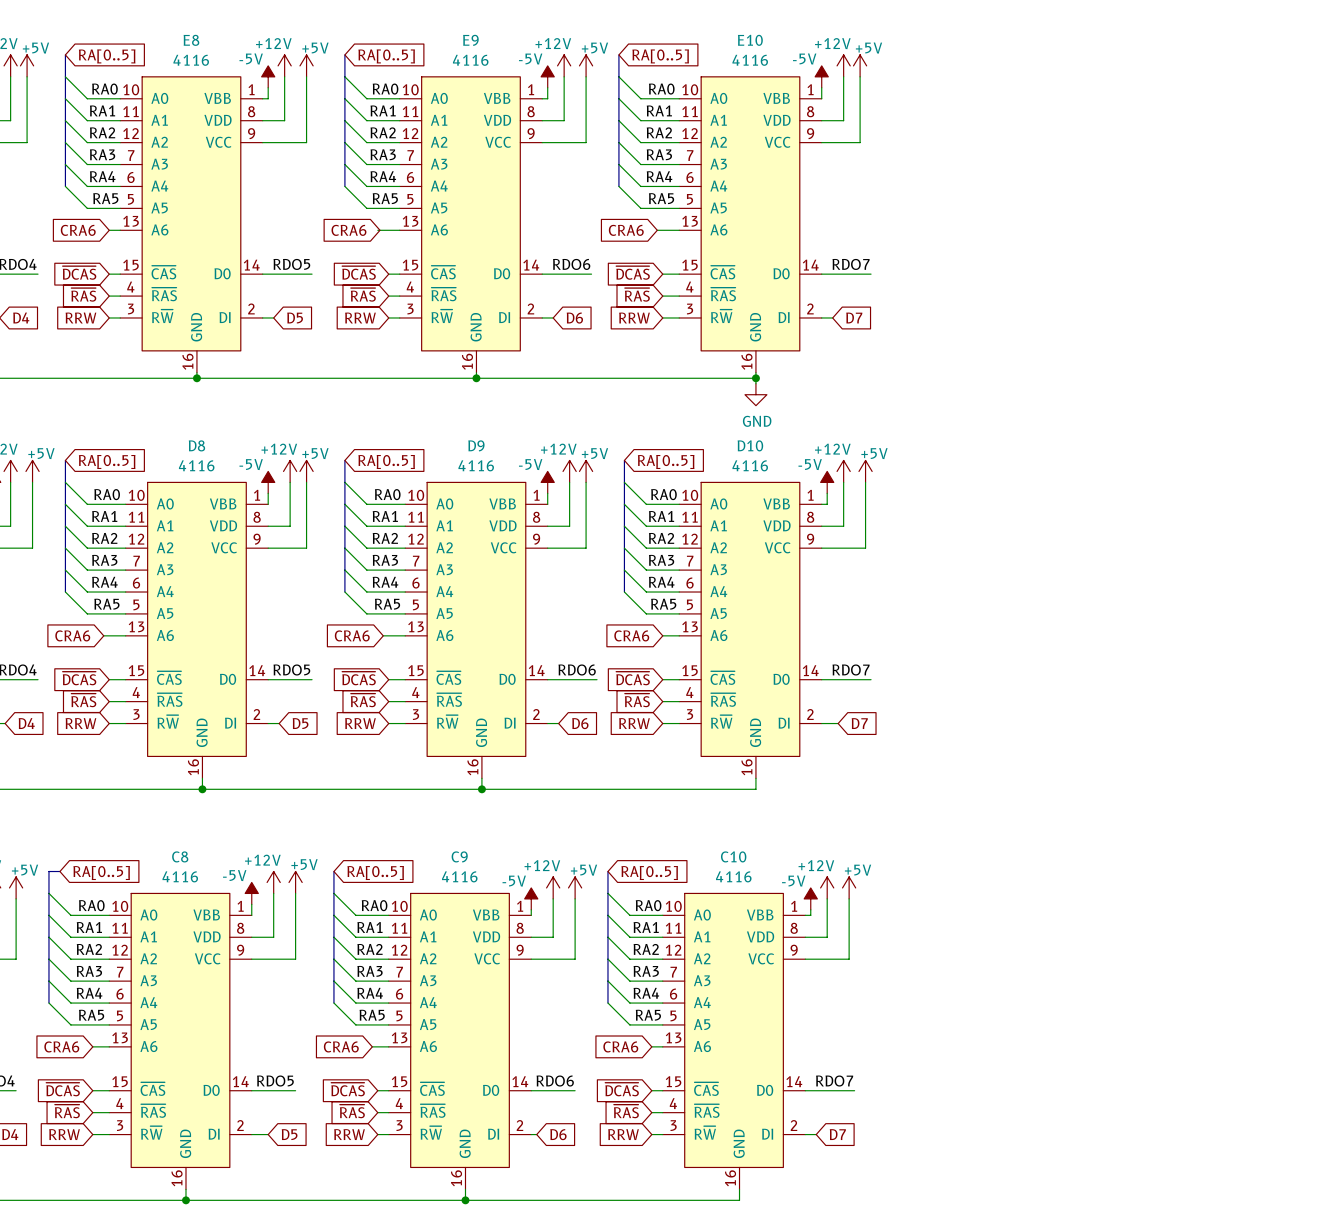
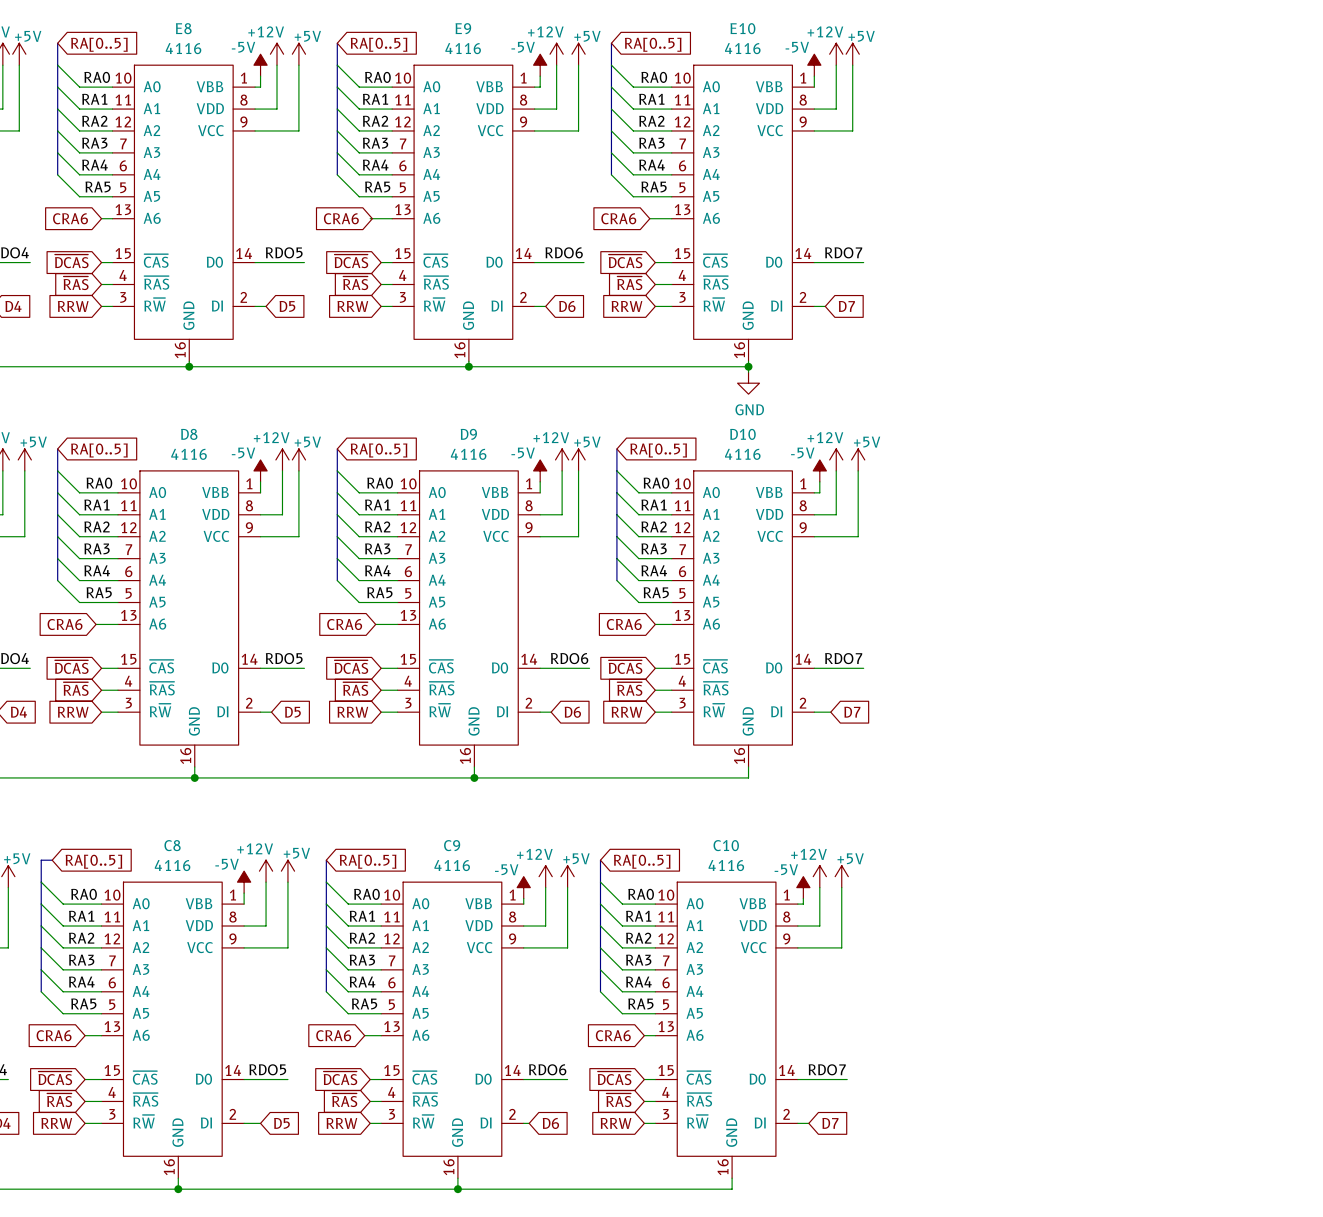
E8 symbol: [120, 76, 263, 373] -> [112, 65, 256, 362]
E9 symbol: [399, 76, 543, 373] -> [392, 65, 535, 362]
E10 symbol: [679, 76, 822, 373] -> [671, 65, 815, 362]
D8 symbol: [125, 482, 269, 779] -> [117, 470, 261, 768]
D9 symbol: [405, 482, 548, 779] -> [397, 470, 541, 768]
D10 symbol: [679, 482, 822, 779] -> [671, 470, 815, 768]
C8 symbol: [109, 893, 252, 1190] -> [101, 882, 245, 1179]
C9 symbol: [388, 893, 532, 1190] -> [381, 882, 524, 1179]
C10 symbol: [662, 893, 806, 1190] -> [655, 882, 798, 1179]

